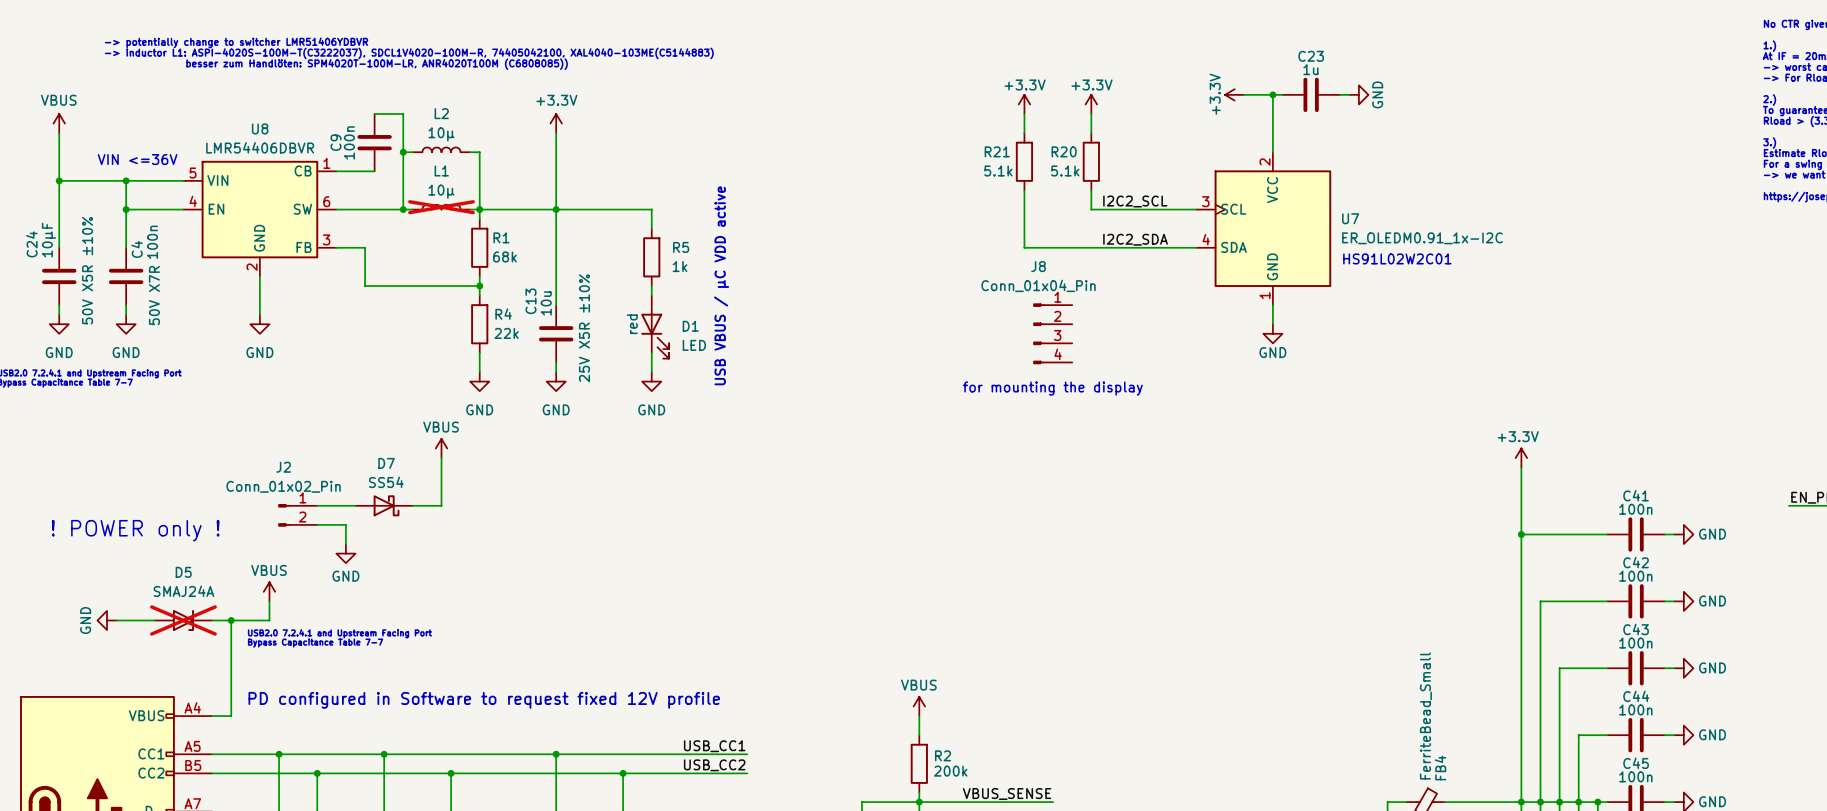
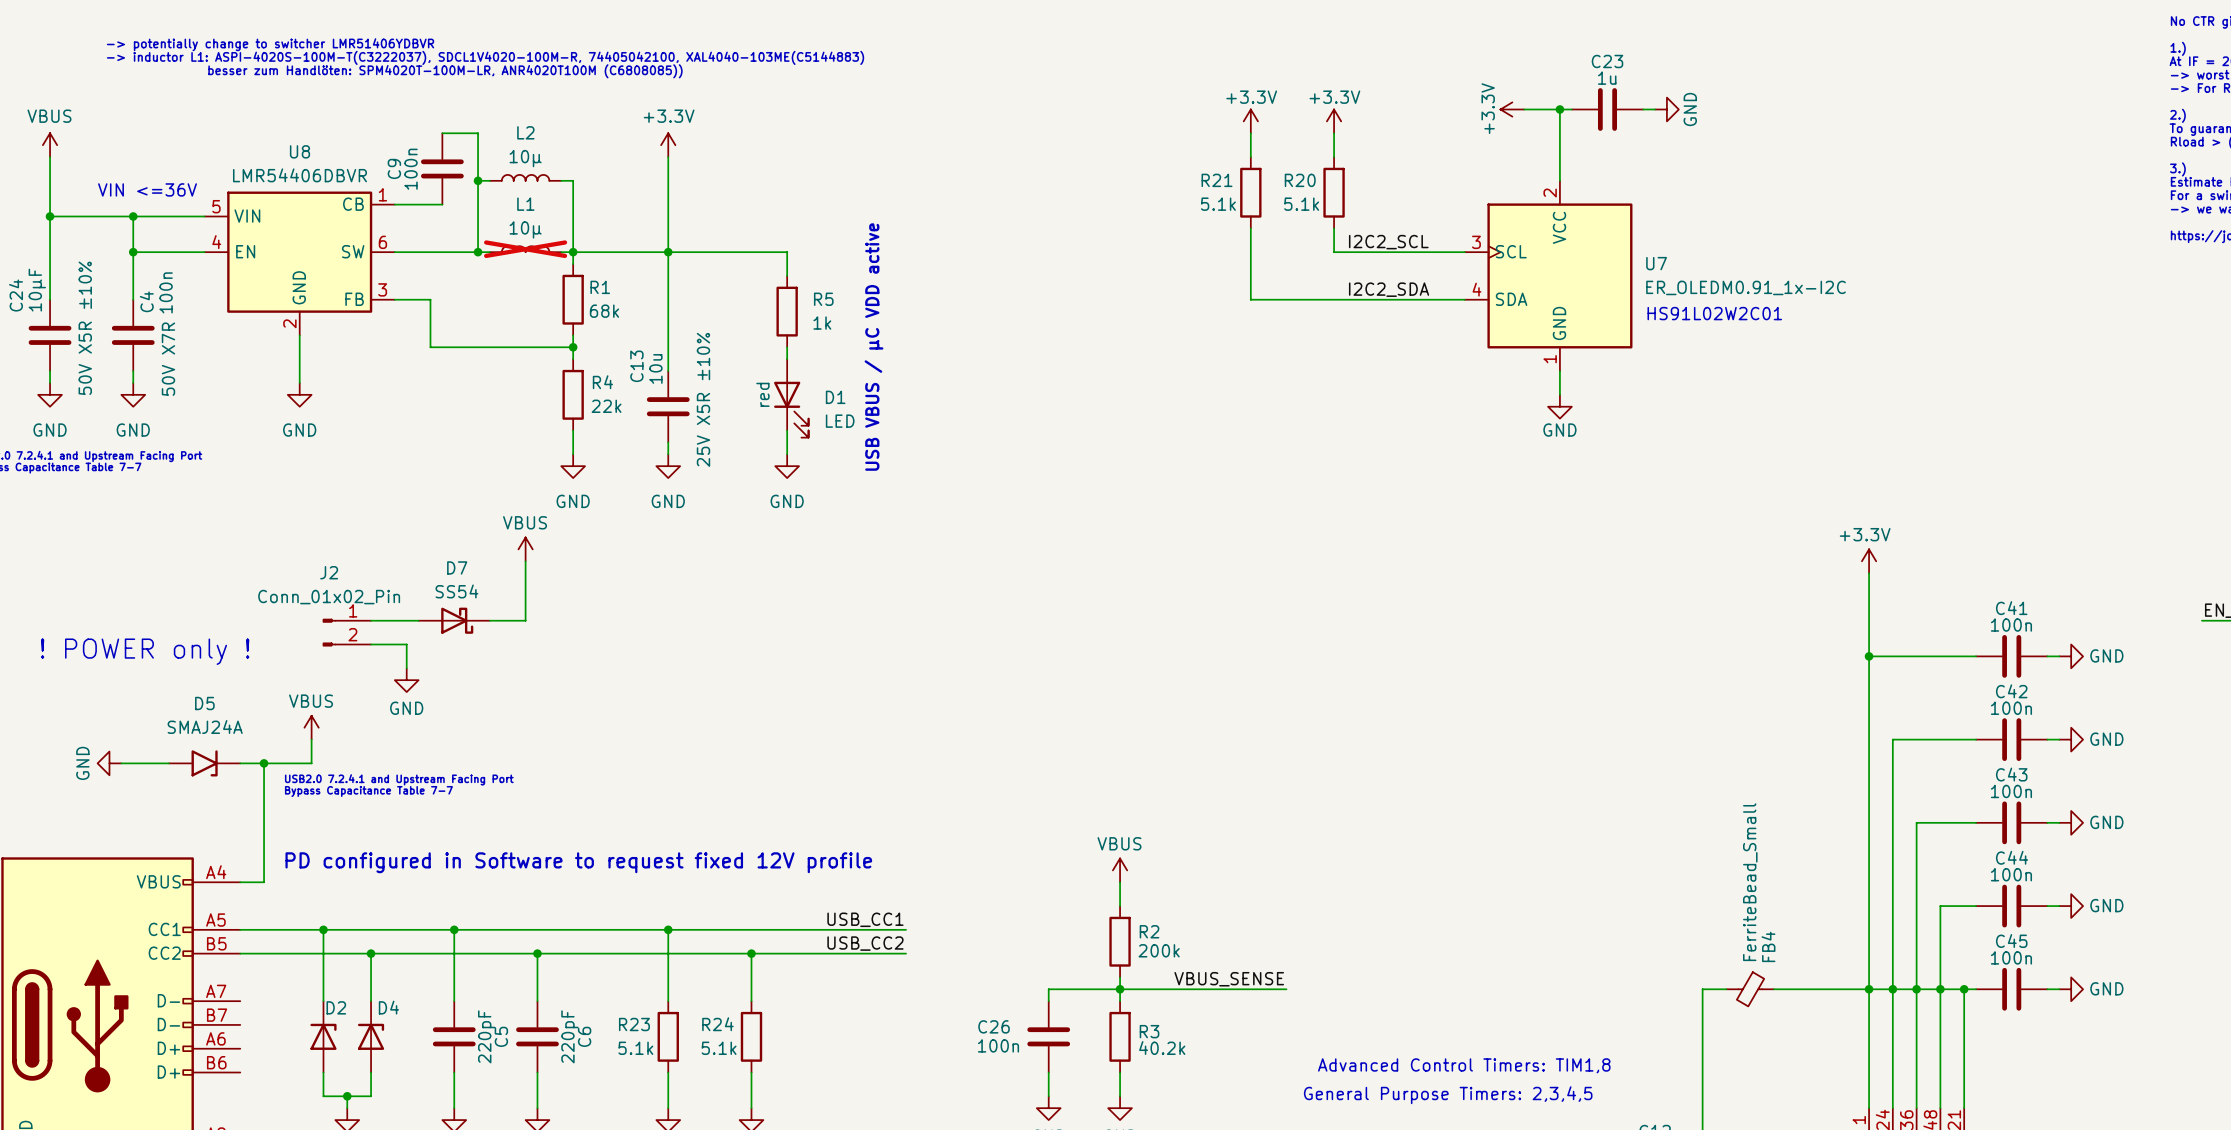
J8: Conn_01x04_Pin (1052, 333) -> none
text: for mounting the display (1052, 388) -> none
D5 do-not-place cross: (183, 620) -> none

